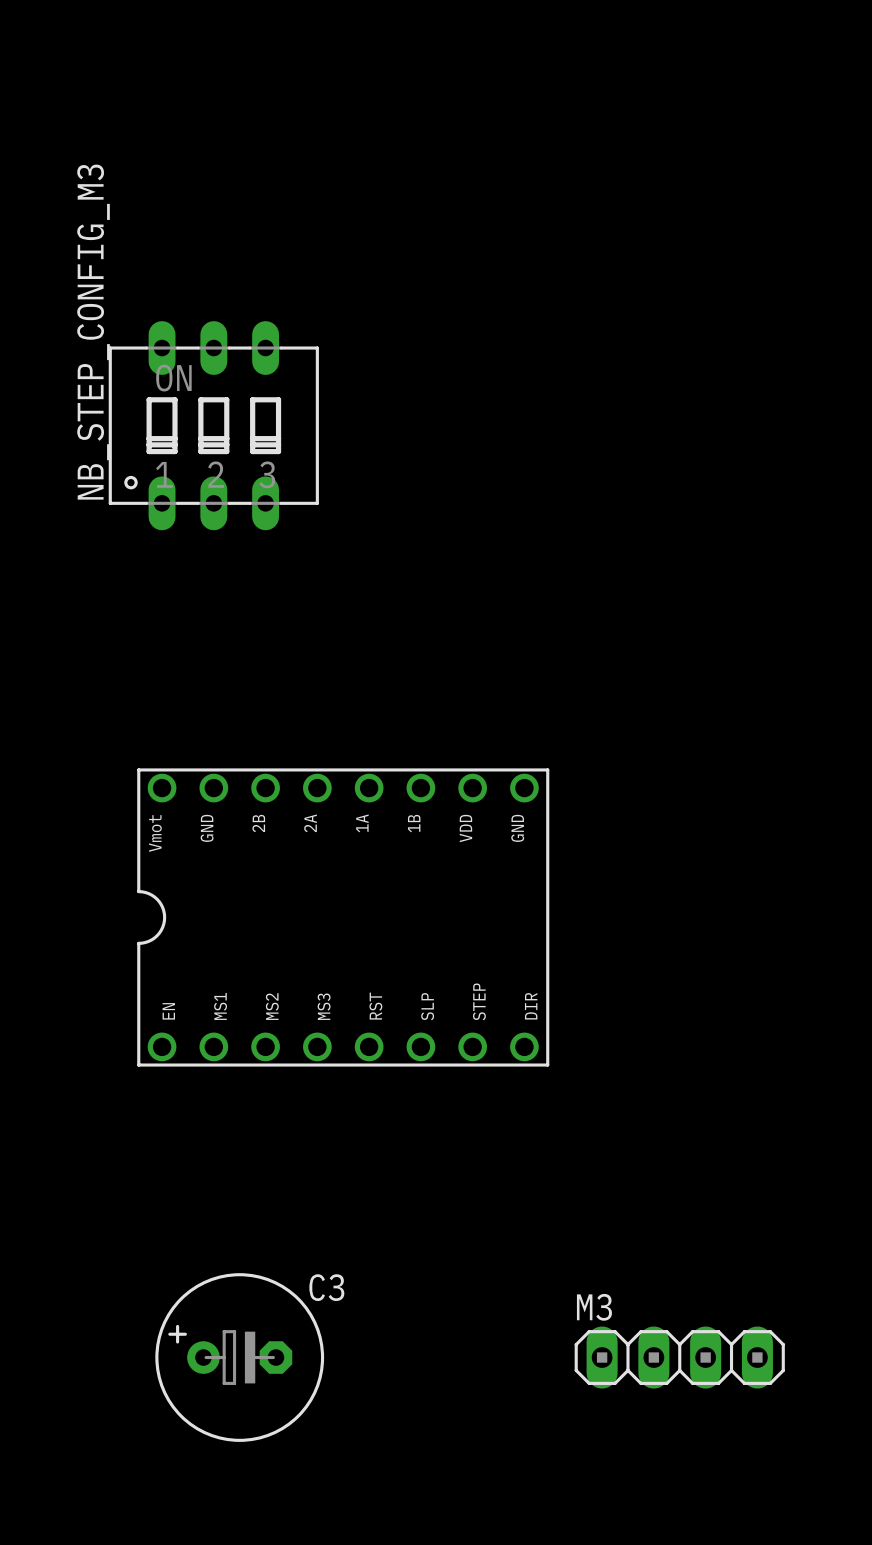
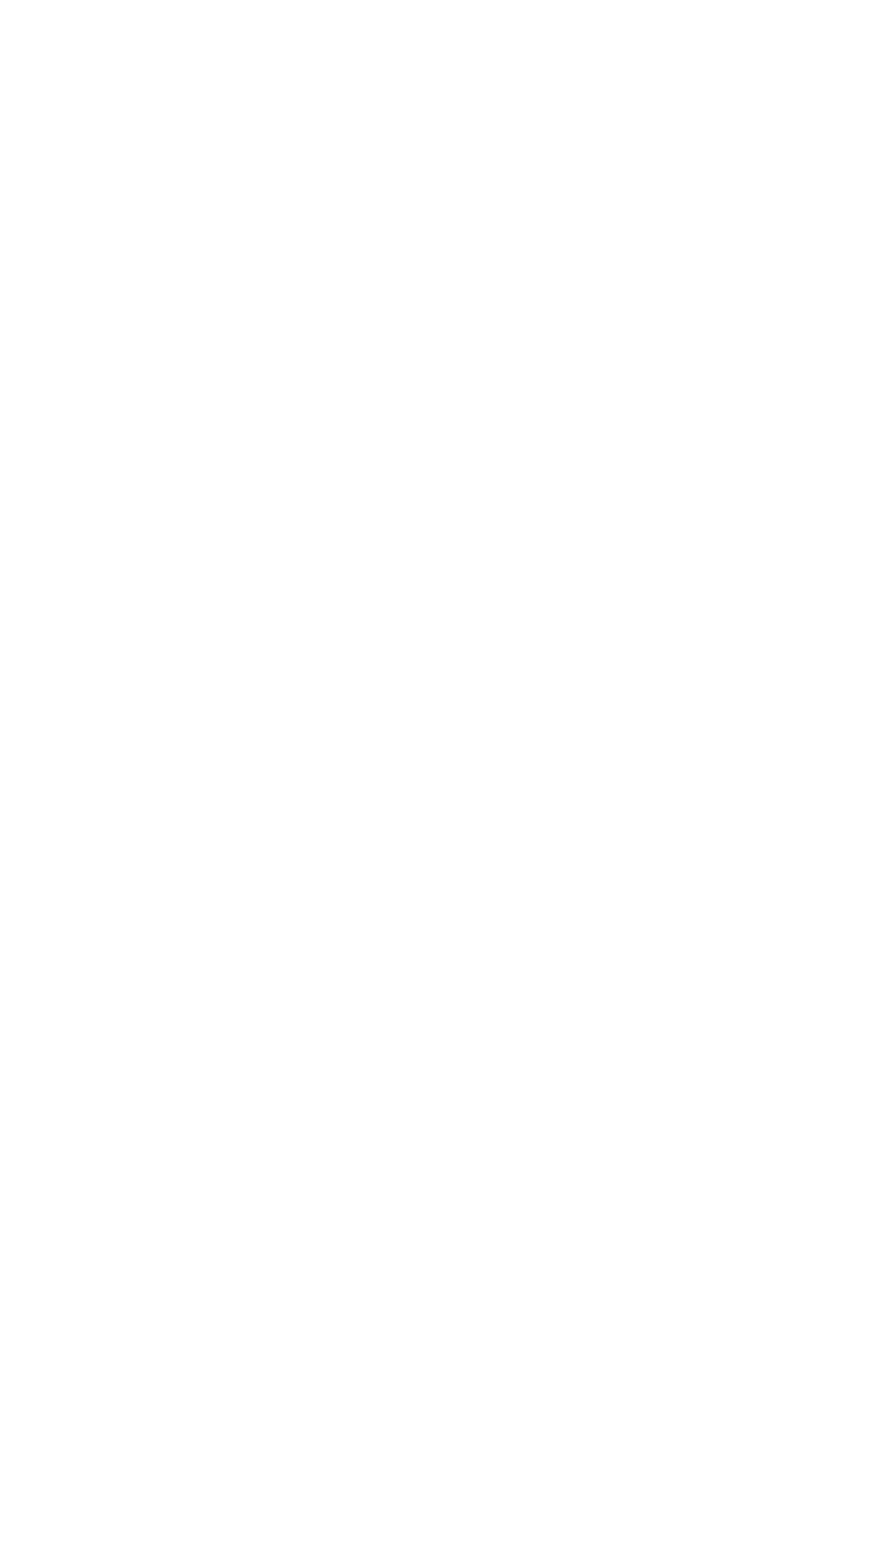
NB_STEP_CONFIG_M3: (213, 425) -> none
part: (343, 917) -> none
C3: (239, 1357) -> none
M3: (679, 1357) -> none

